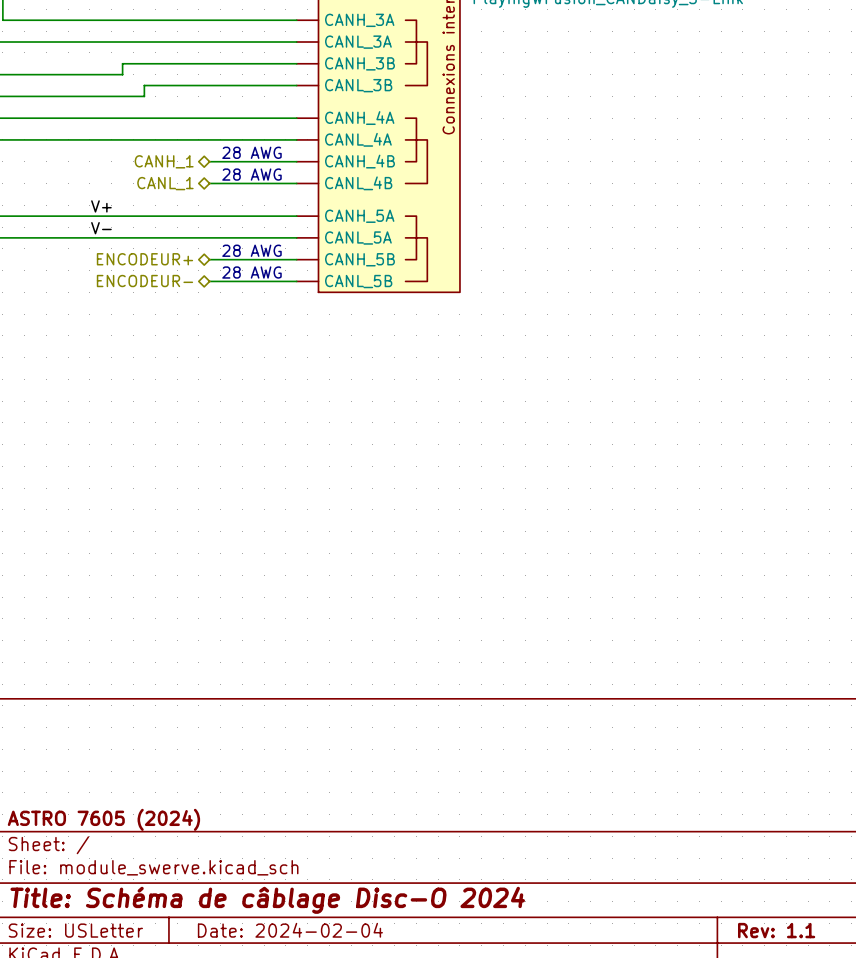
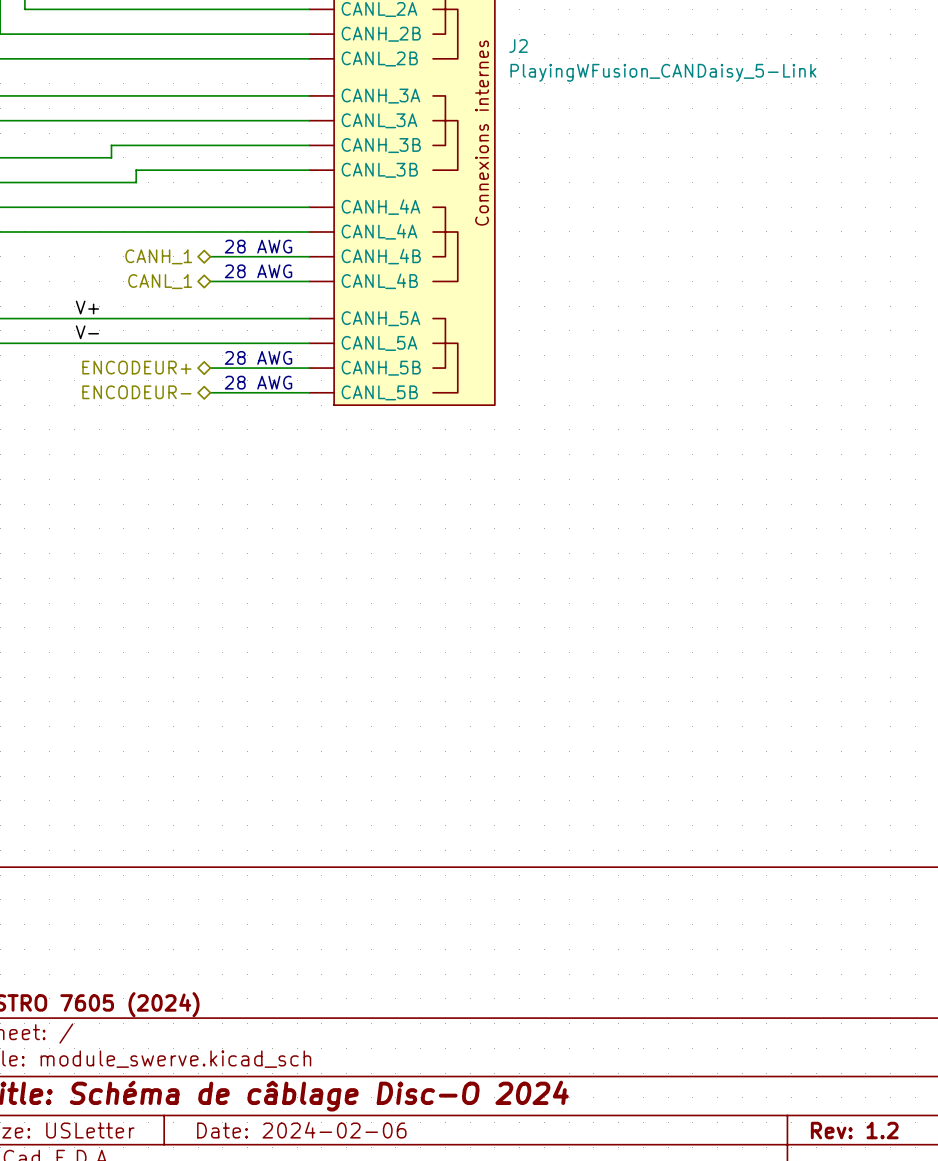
title block: Date: 2024-02-04 (290, 930) -> Date: 2024-02-06 (301, 1130)
title block: Rev: 1.1 (776, 930) -> Rev: 1.2 (854, 1130)

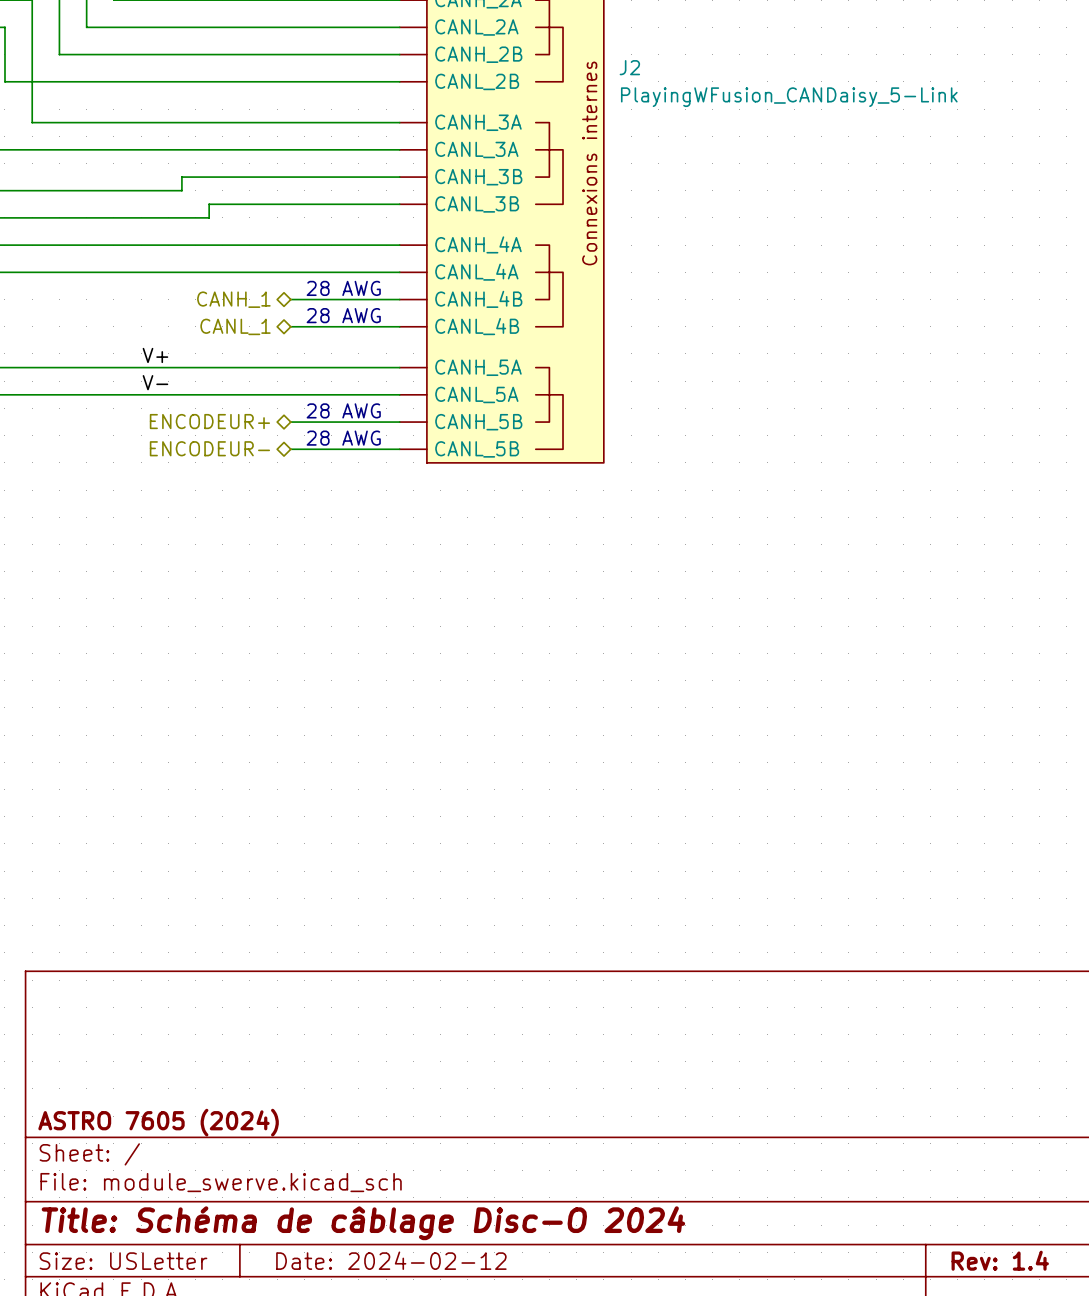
title block: Date: 2024-02-06 (301, 1130) -> Date: 2024-02-12 (391, 1260)
title block: Rev: 1.2 (854, 1130) -> Rev: 1.4 (1000, 1260)

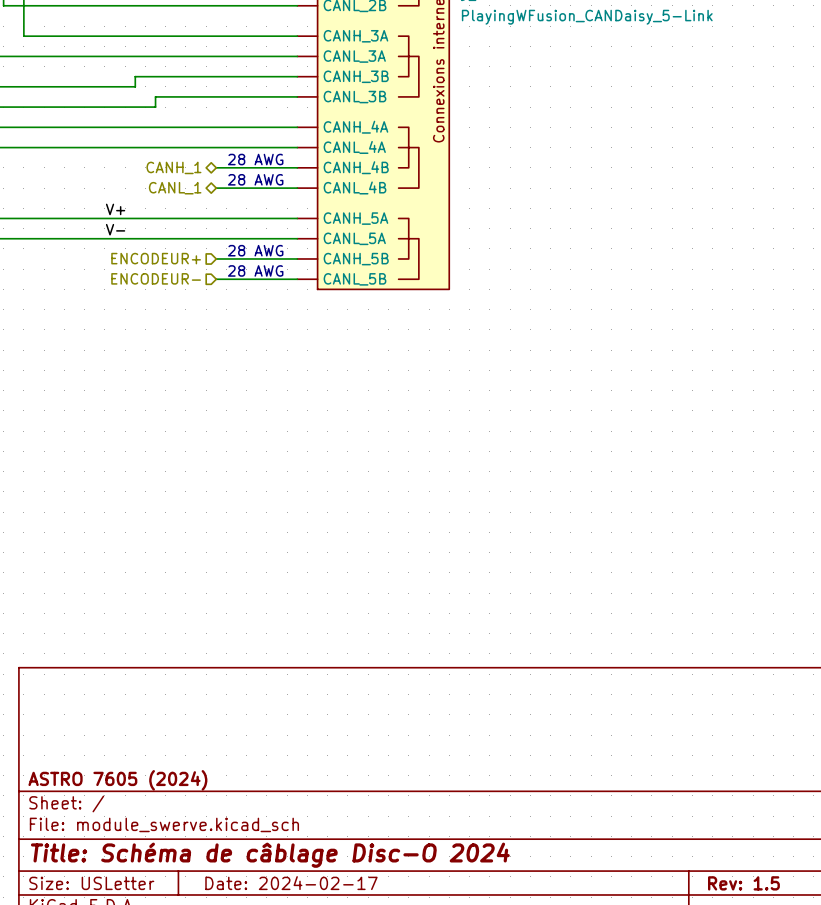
hierarchical label shape: bidirectional (209, 421) -> input (156, 258)
hierarchical label shape: bidirectional (209, 448) -> input (156, 278)
title block: Date: 2024-02-12 (391, 1260) -> Date: 2024-02-17 (291, 883)
title block: Rev: 1.4 (1000, 1260) -> Rev: 1.5 (743, 883)

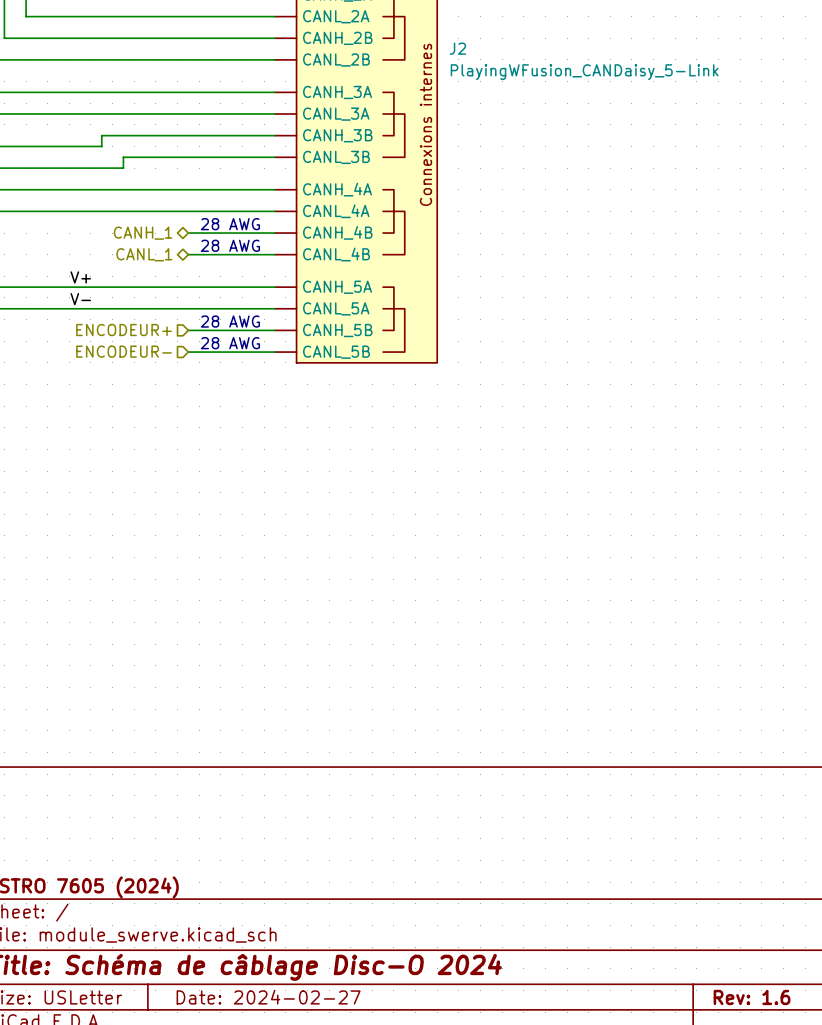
title block: Date: 2024-02-17 (291, 883) -> Date: 2024-02-27 (268, 997)
title block: Rev: 1.5 (743, 883) -> Rev: 1.6 (752, 997)

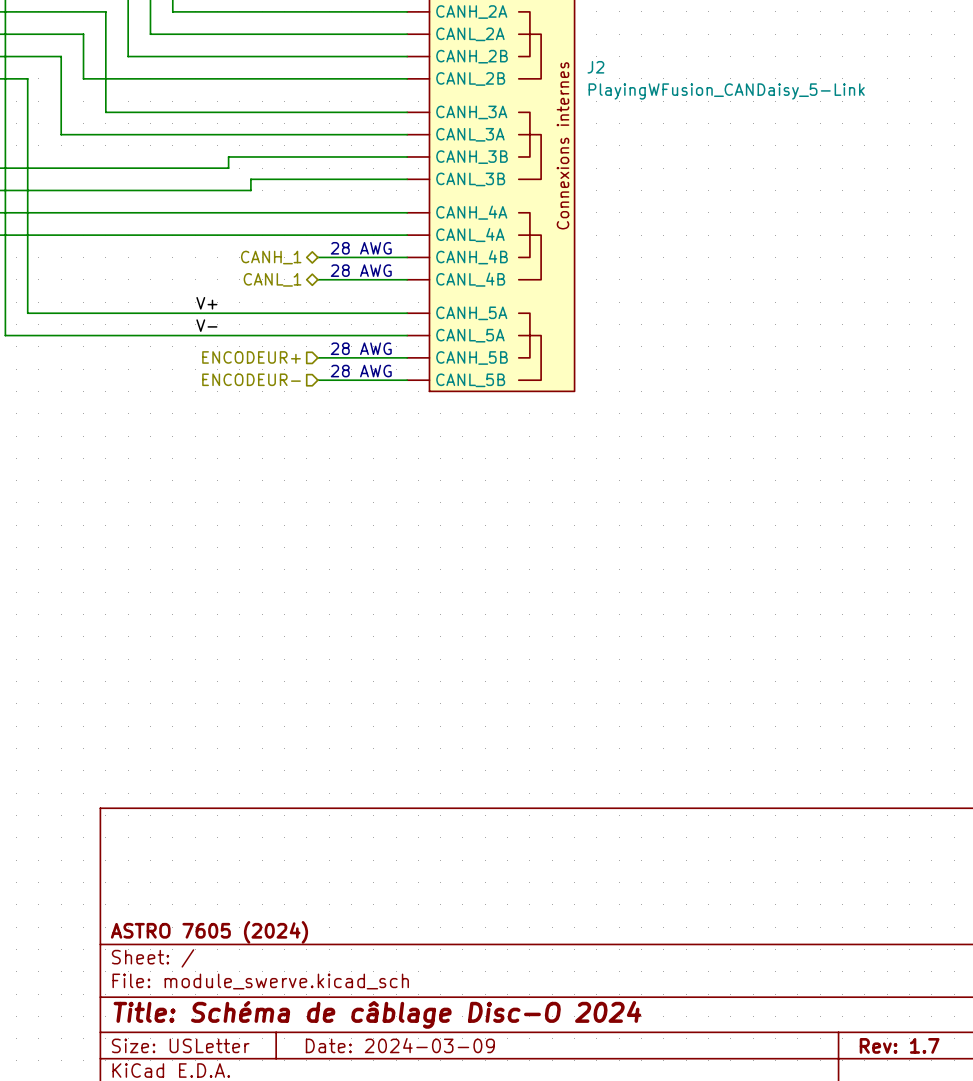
title block: Date: 2024-02-27 (268, 997) -> Date: 2024-03-09 (400, 1045)
title block: Rev: 1.6 (752, 997) -> Rev: 1.7 (899, 1045)

